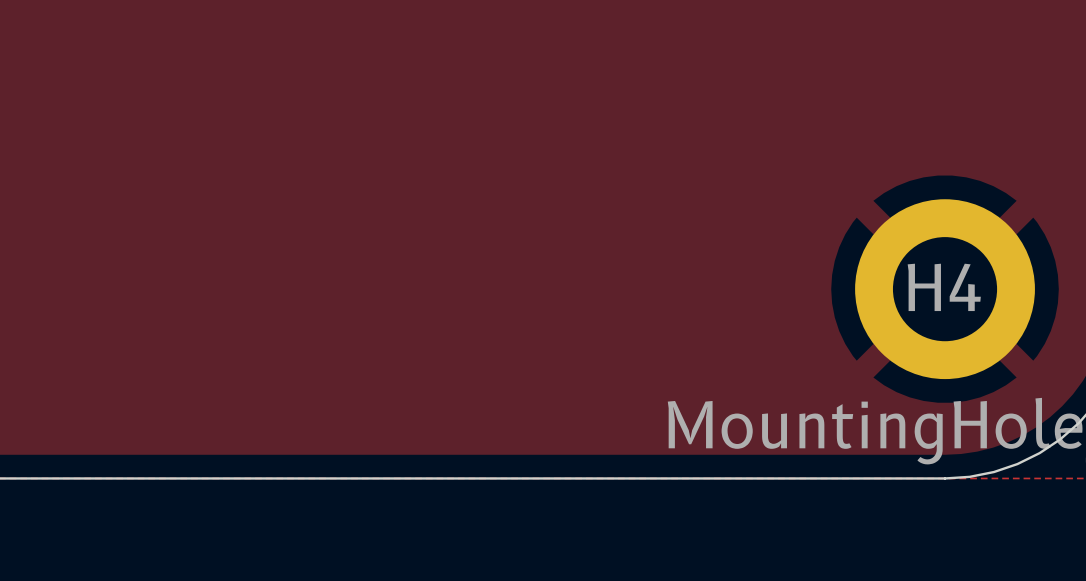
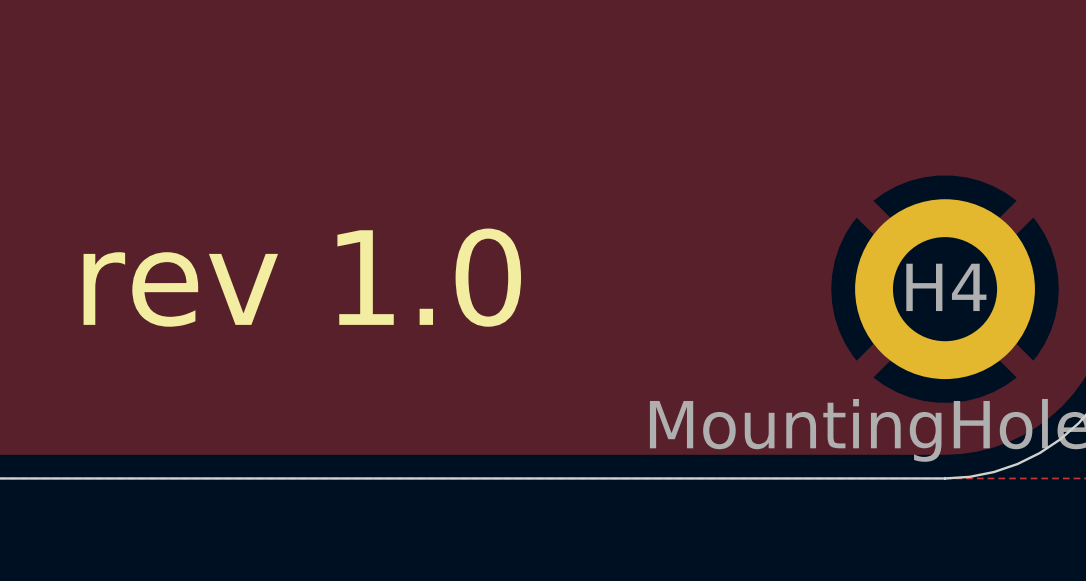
text: none -> rev 1.0 (302, 277)

